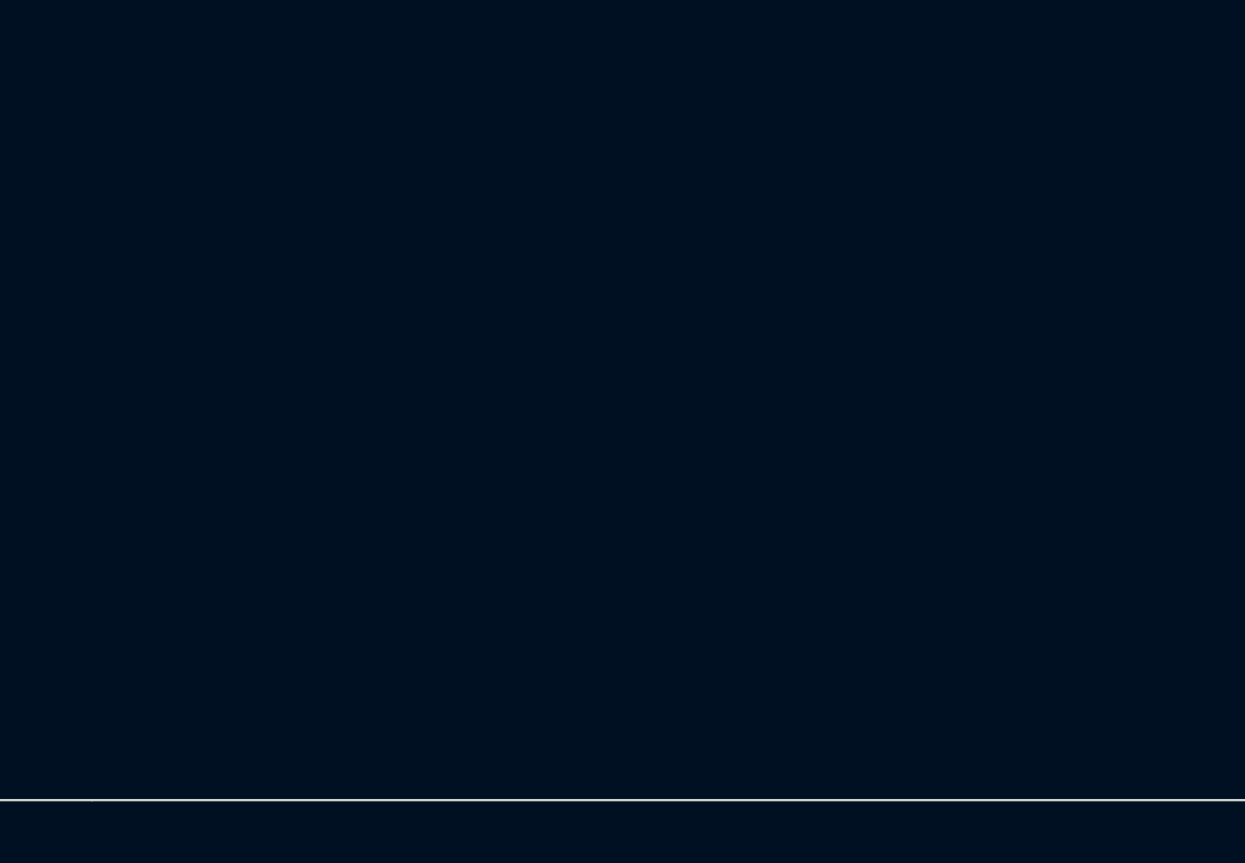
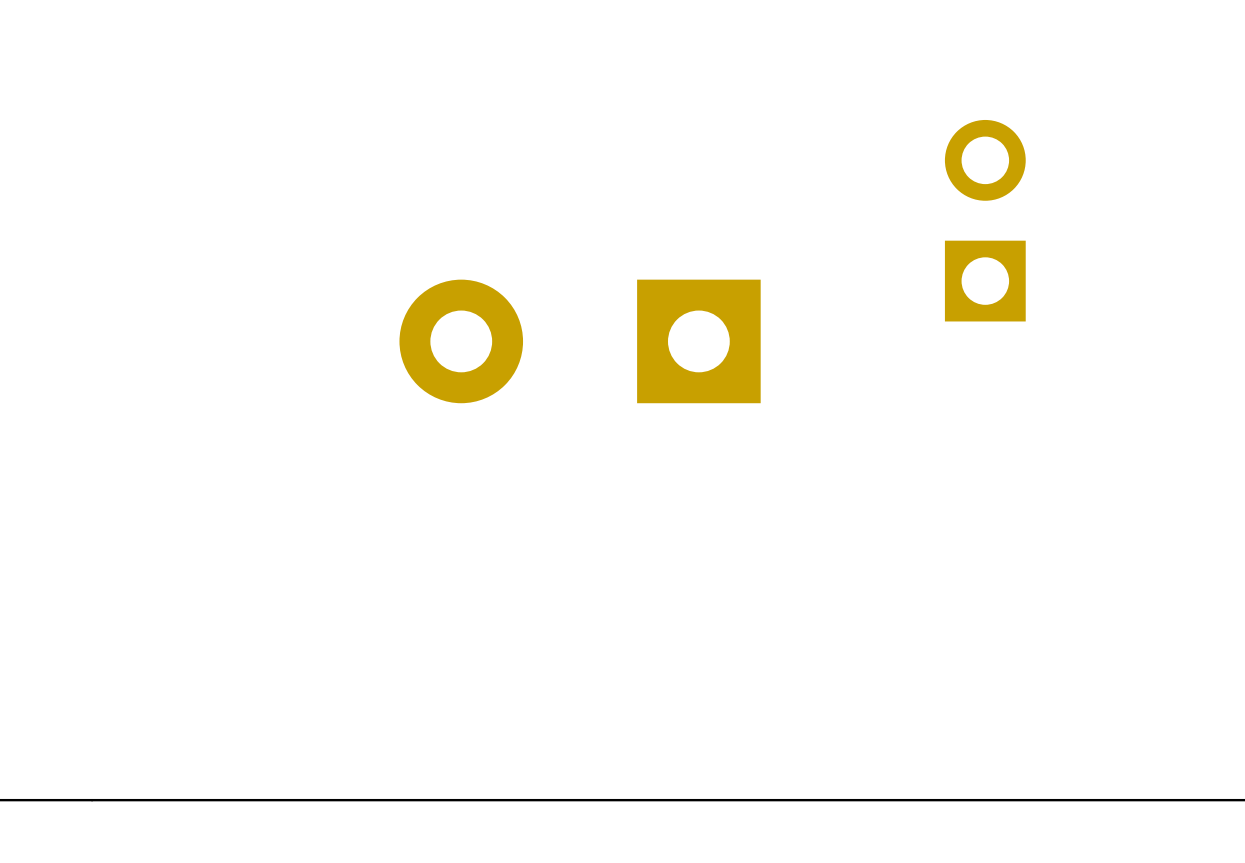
part: none -> (985, 220)
part: none -> (580, 341)

